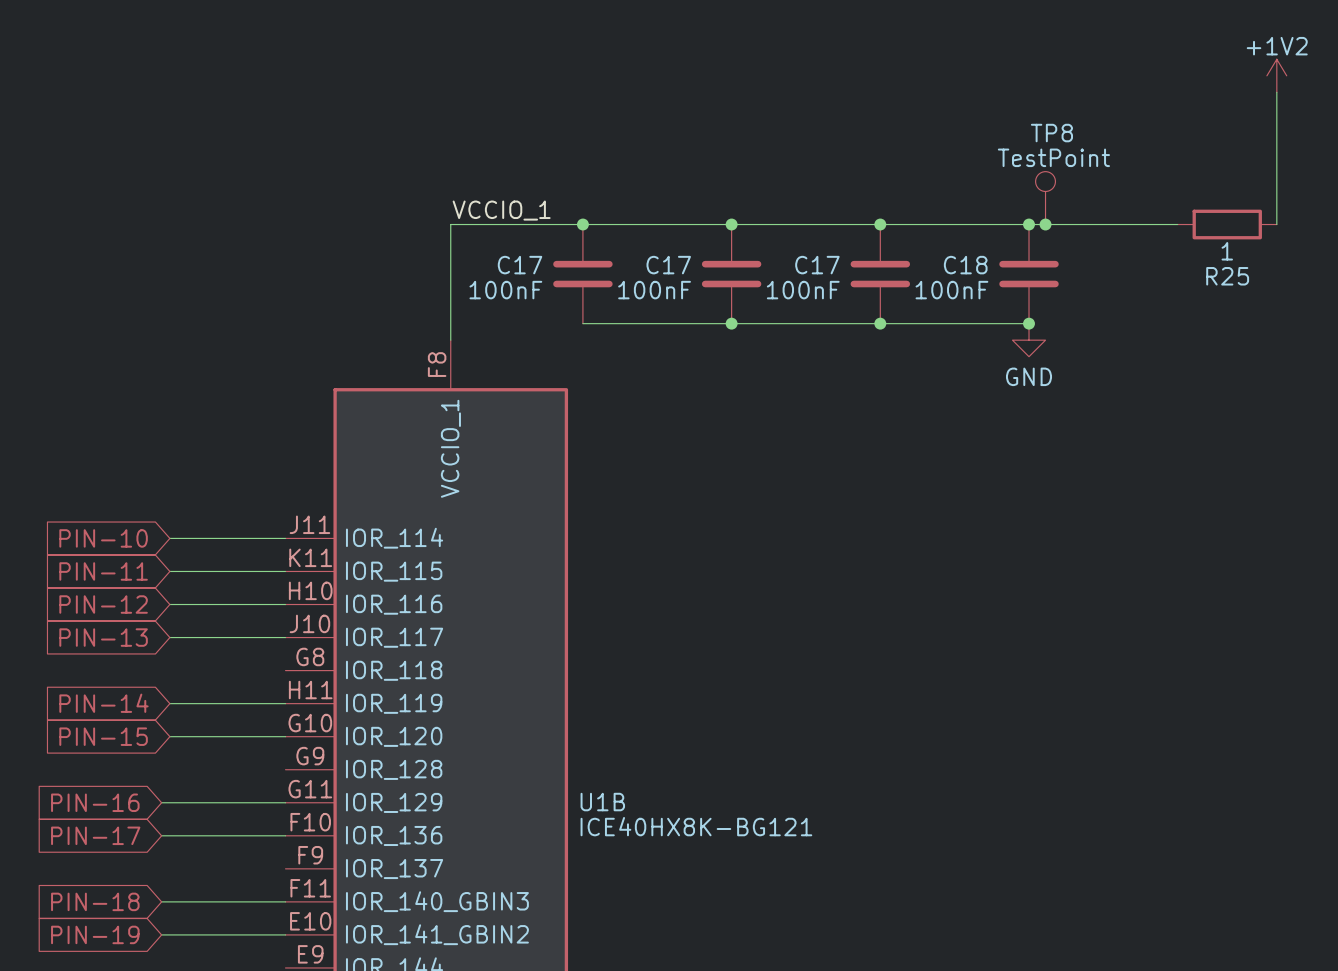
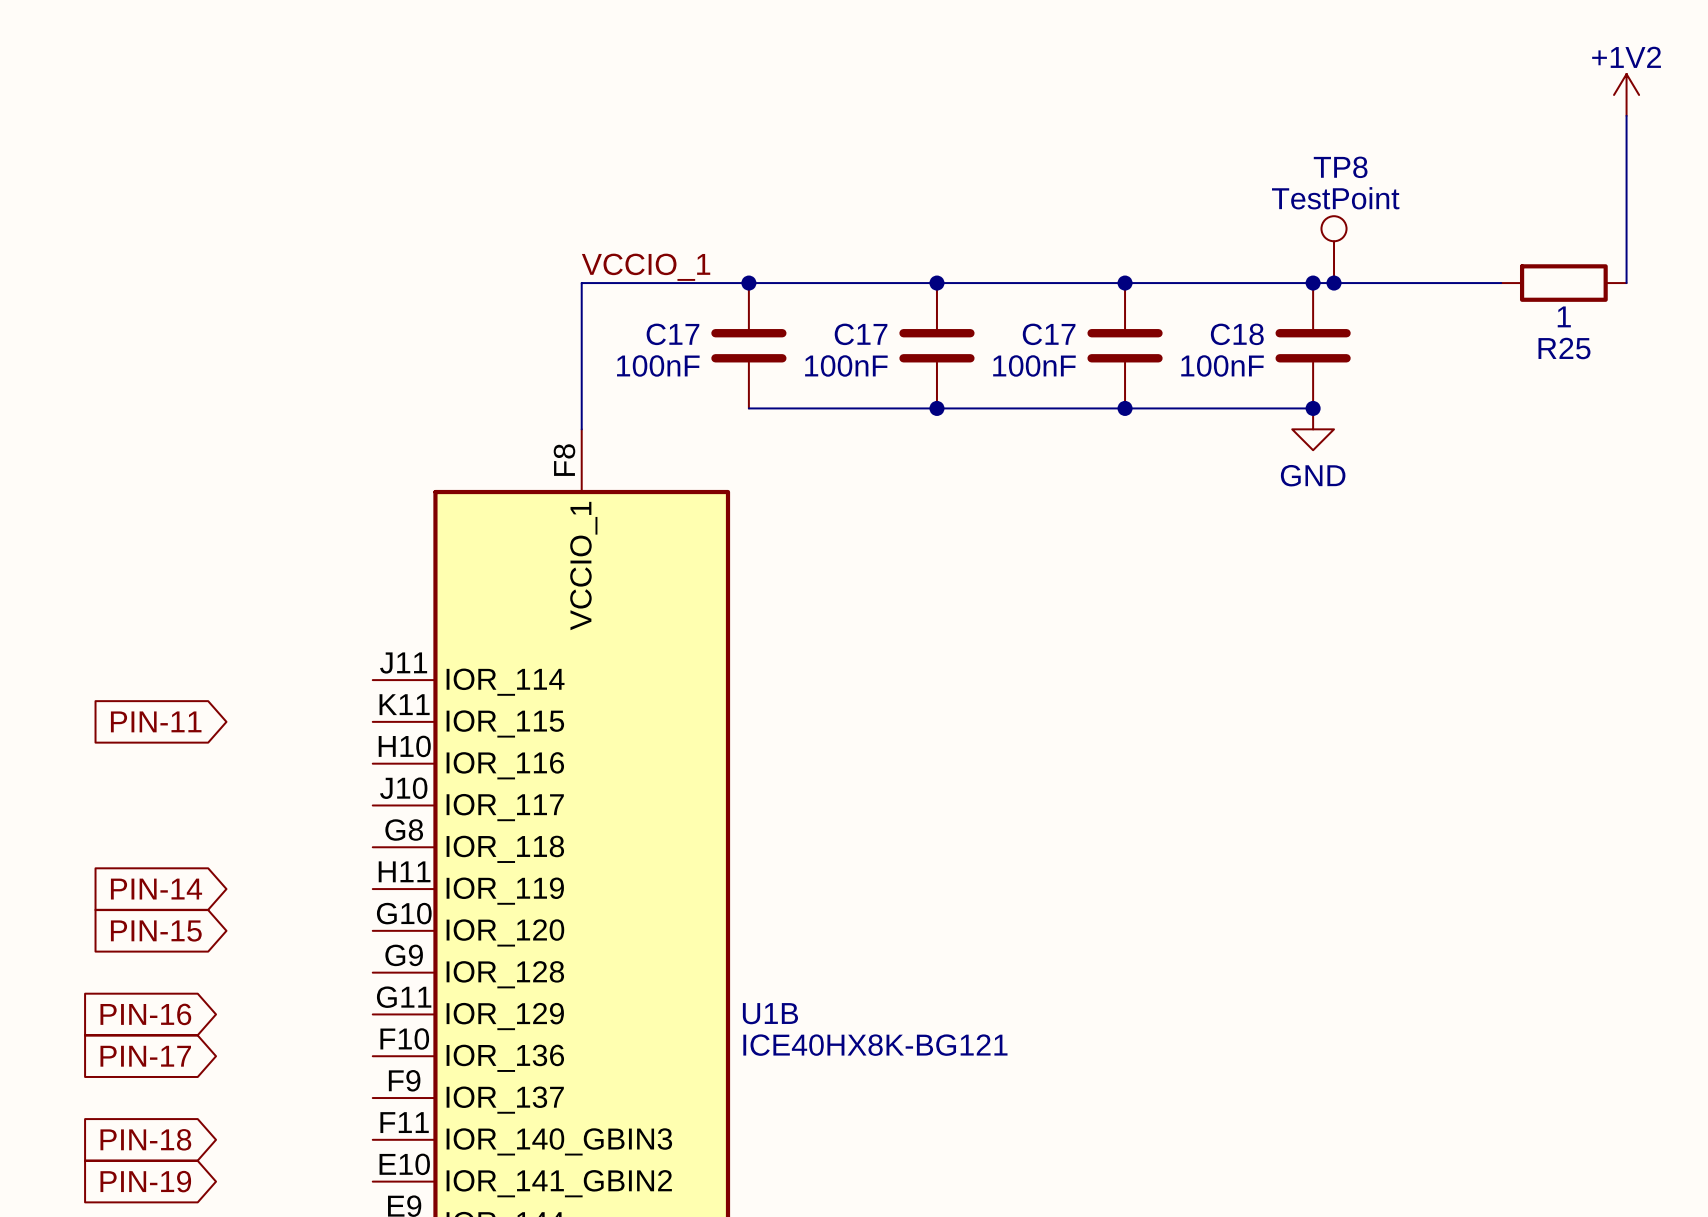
global label: PIN-10 (103, 538) -> none
wire: (169, 538) (285, 538) -> none
wire: (169, 571) (285, 571) -> none
global label: PIN-12 (103, 604) -> none
wire: (169, 604) (285, 604) -> none
global label: PIN-13 (103, 637) -> none
wire: (169, 637) (285, 637) -> none
wire: (169, 703) (285, 703) -> none
wire: (169, 736) (285, 736) -> none
wire: (161, 802) (285, 802) -> none
wire: (161, 835) (285, 835) -> none
wire: (161, 901) (285, 901) -> none
wire: (161, 934) (285, 934) -> none

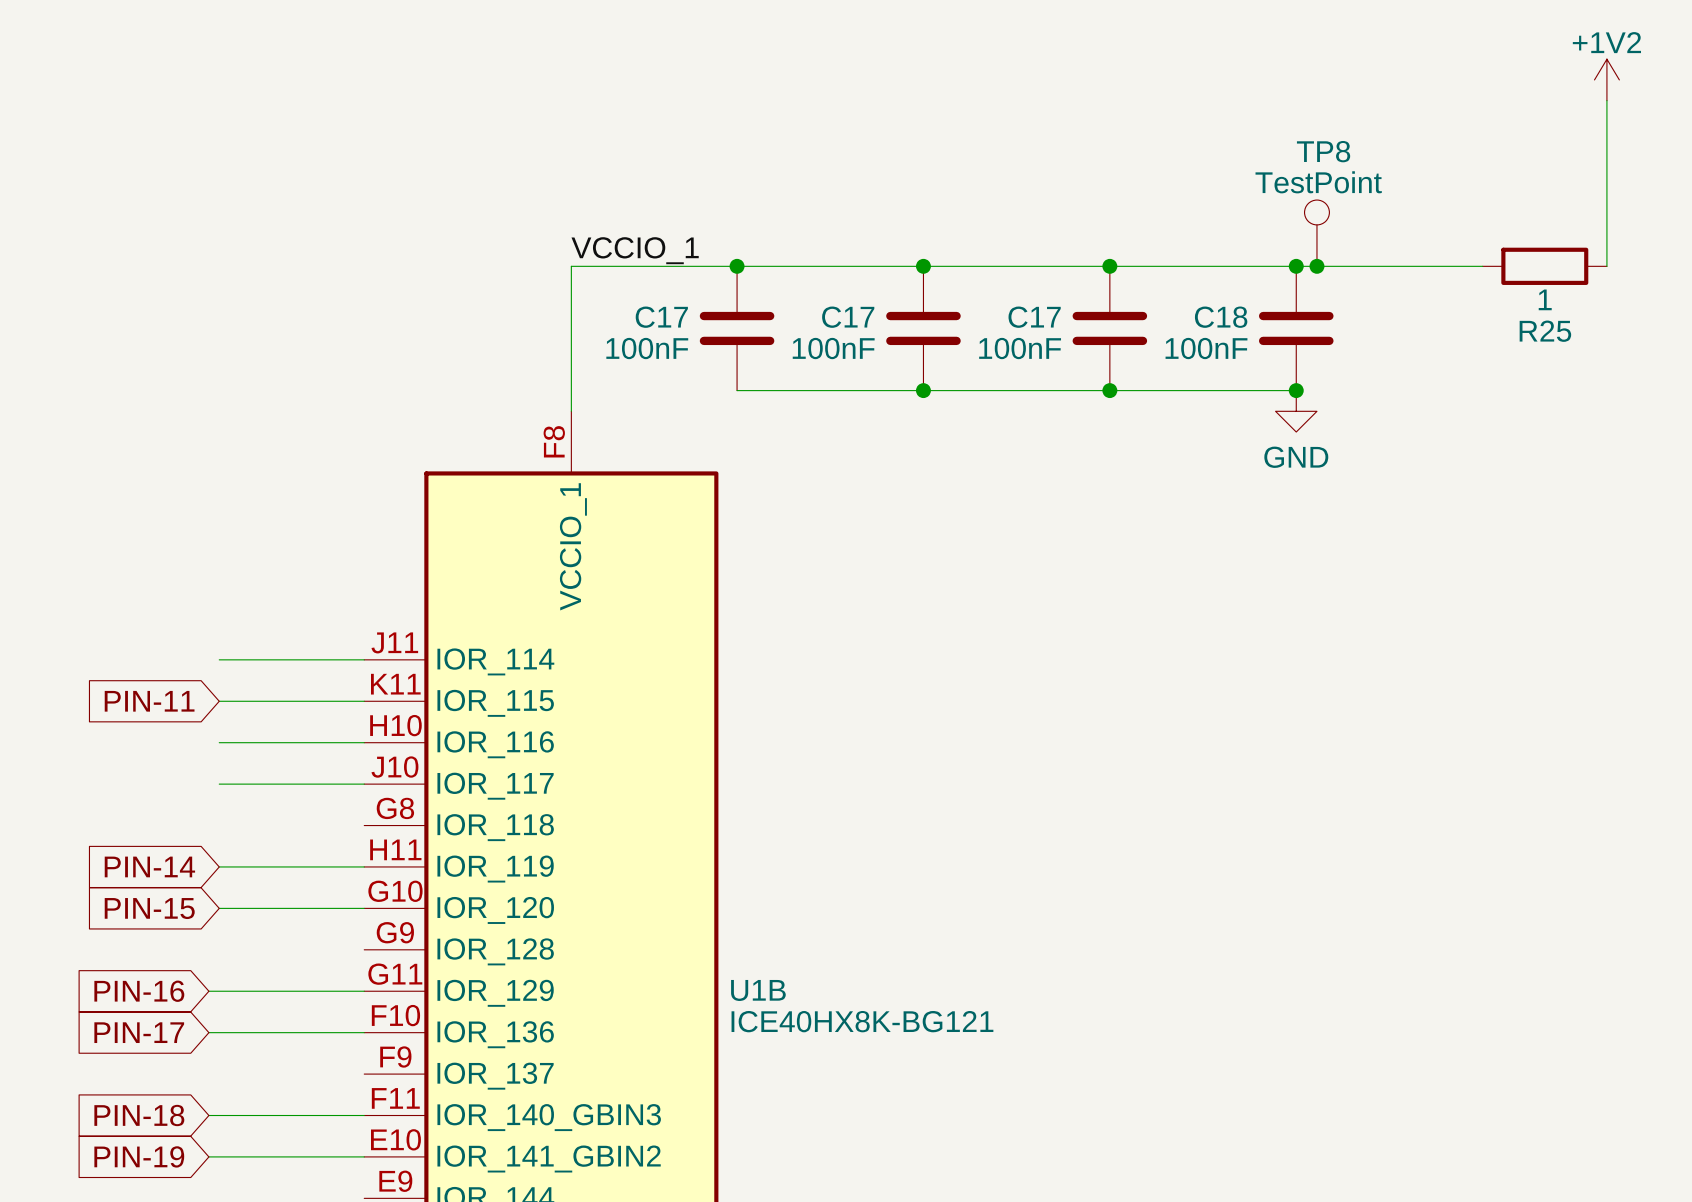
wire: none -> (219, 659) (364, 659)
wire: none -> (219, 701) (364, 701)
wire: none -> (219, 742) (364, 742)
wire: none -> (219, 784) (364, 784)
wire: none -> (219, 866) (364, 866)
wire: none -> (219, 908) (364, 908)
wire: none -> (208, 991) (364, 991)
wire: none -> (208, 1032) (364, 1032)
wire: none -> (208, 1115) (364, 1115)
wire: none -> (208, 1156) (364, 1156)

